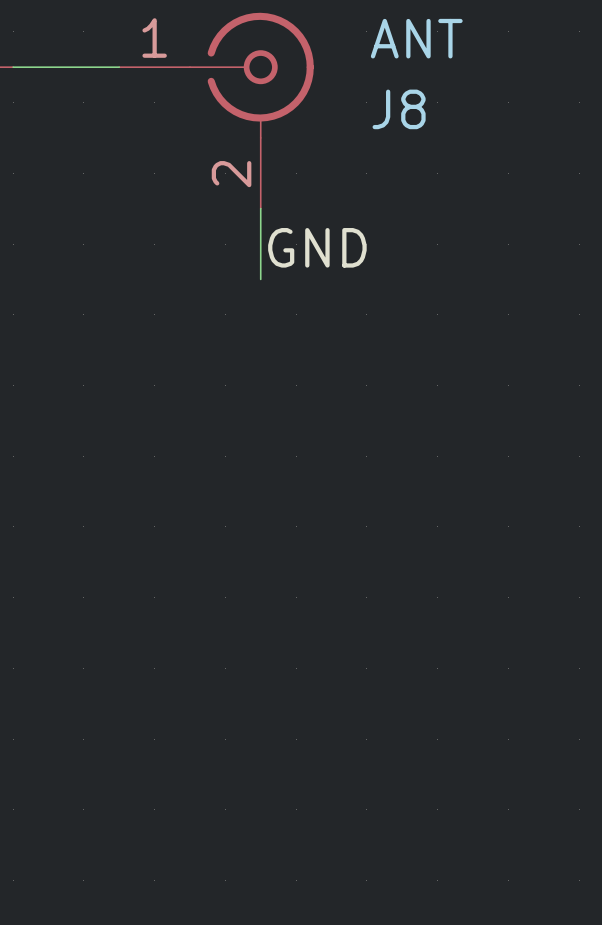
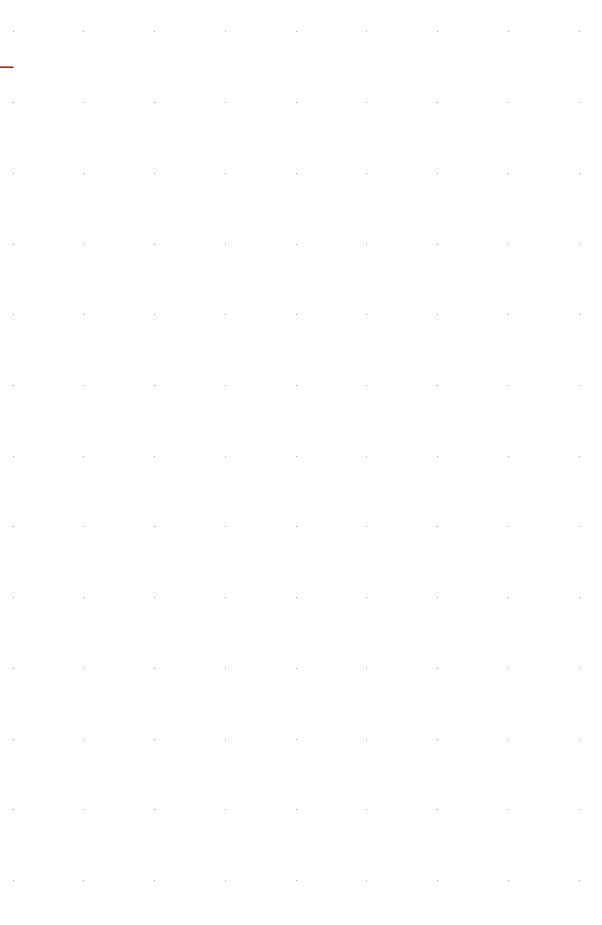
wire: (13, 67) (119, 67) -> none
J8: ANT (216, 110) -> none
wire: (260, 208) (260, 279) -> none
label: GND (317, 247) -> none

